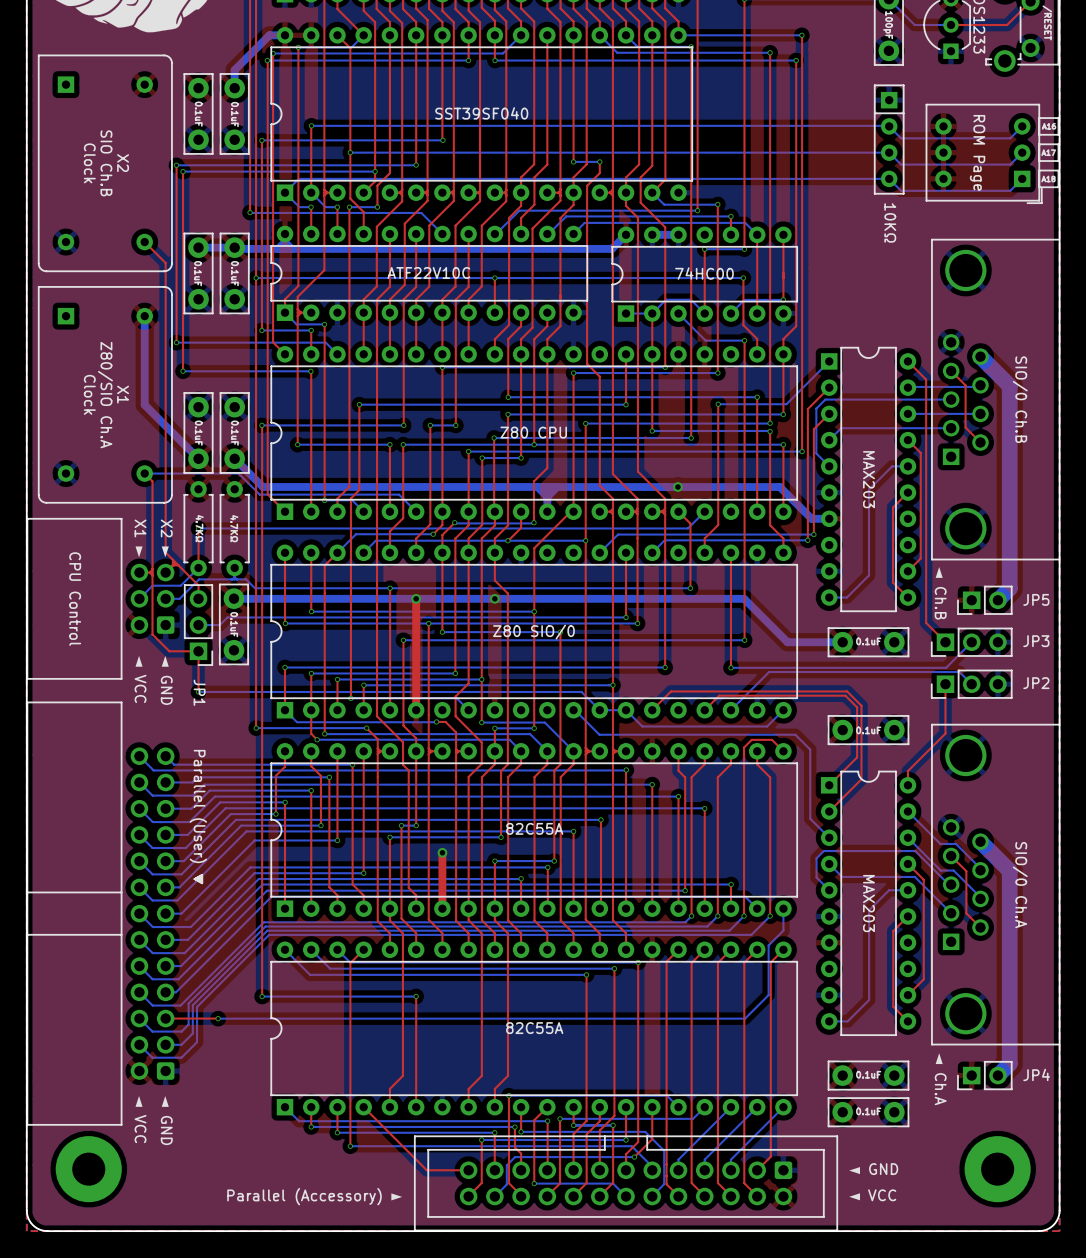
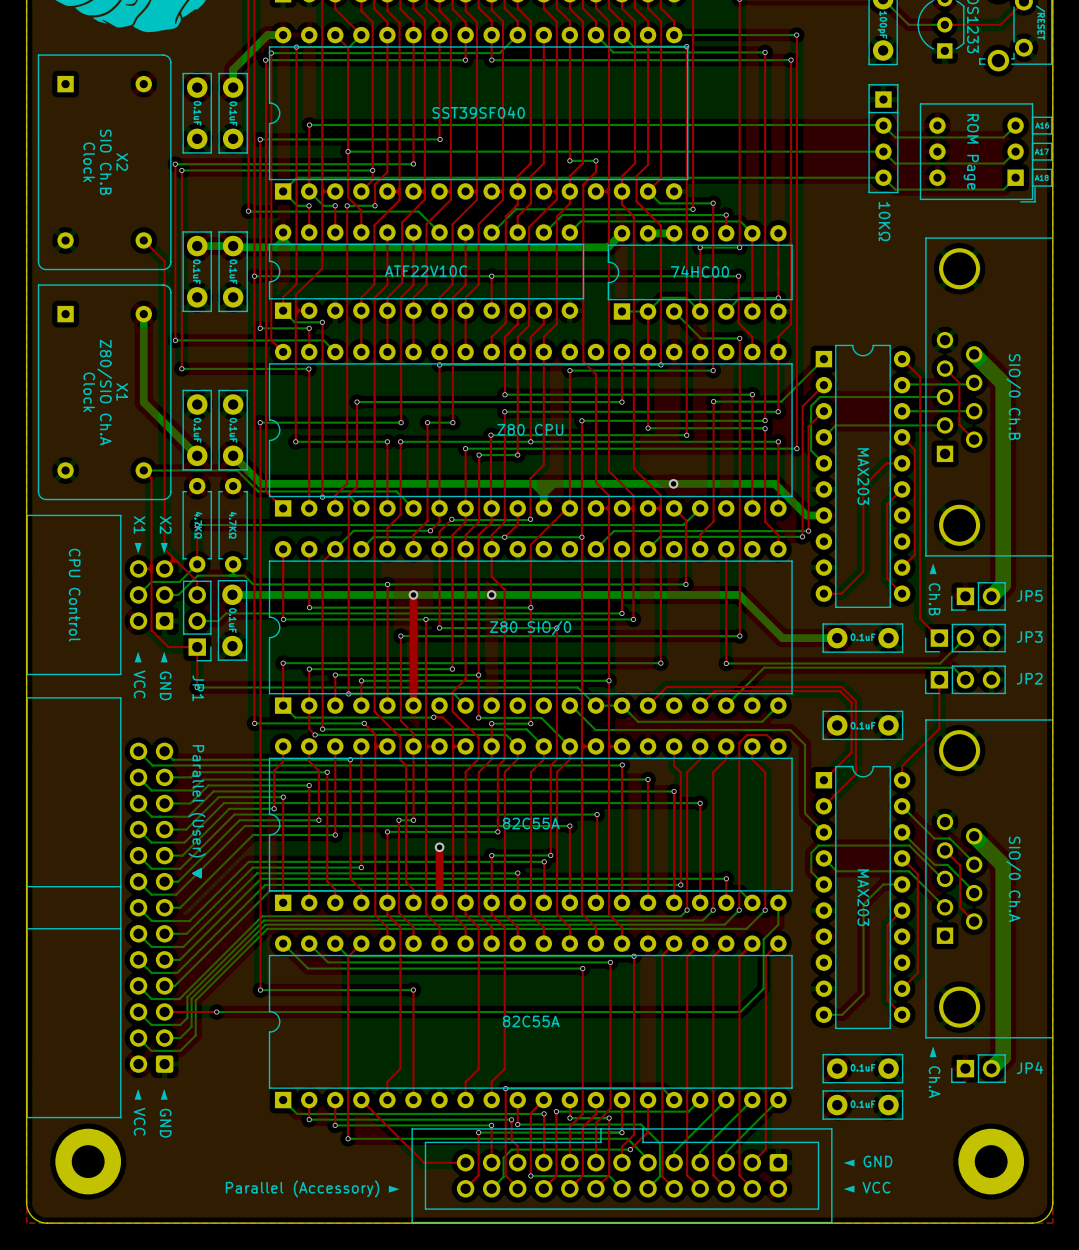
bottom track: (907, 466) (892, 466) (869, 489) (869, 575) (846, 597) (829, 597) -> none
top track: none -> (902, 463) (886, 463) (863, 486) (863, 571) (841, 593) (823, 593)

